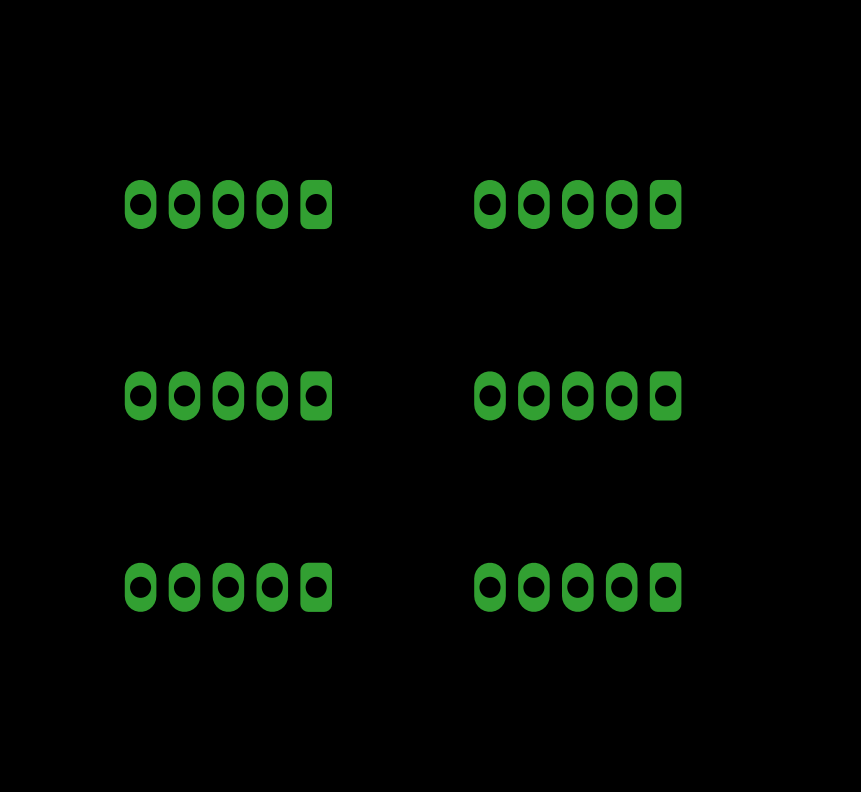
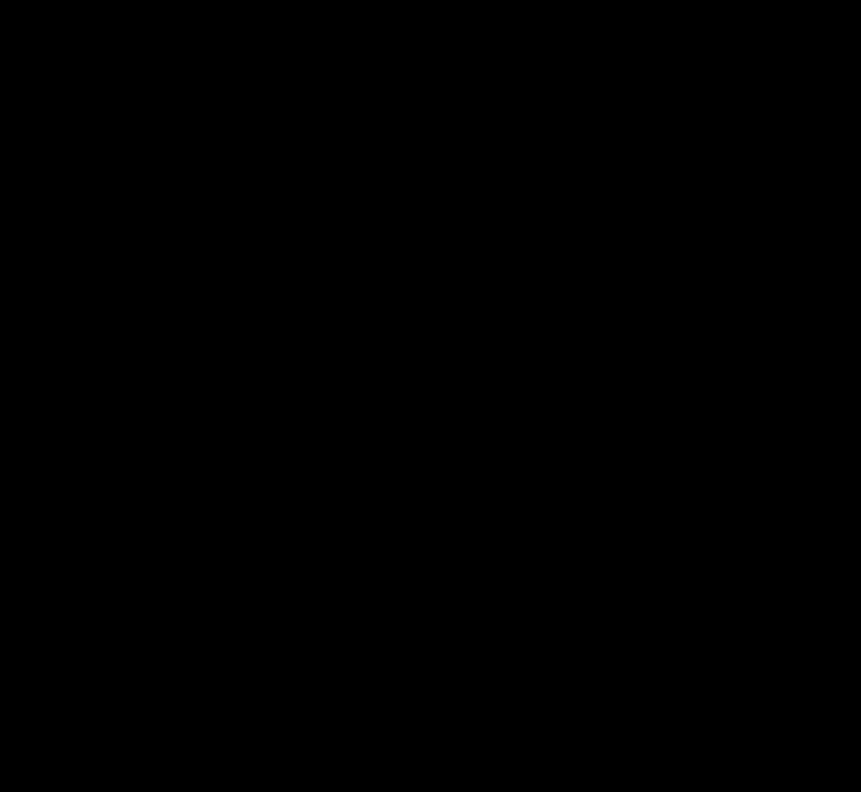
part: (228, 204) -> none
part: (577, 204) -> none
part: (228, 395) -> none
part: (577, 395) -> none
part: (228, 587) -> none
part: (577, 587) -> none

